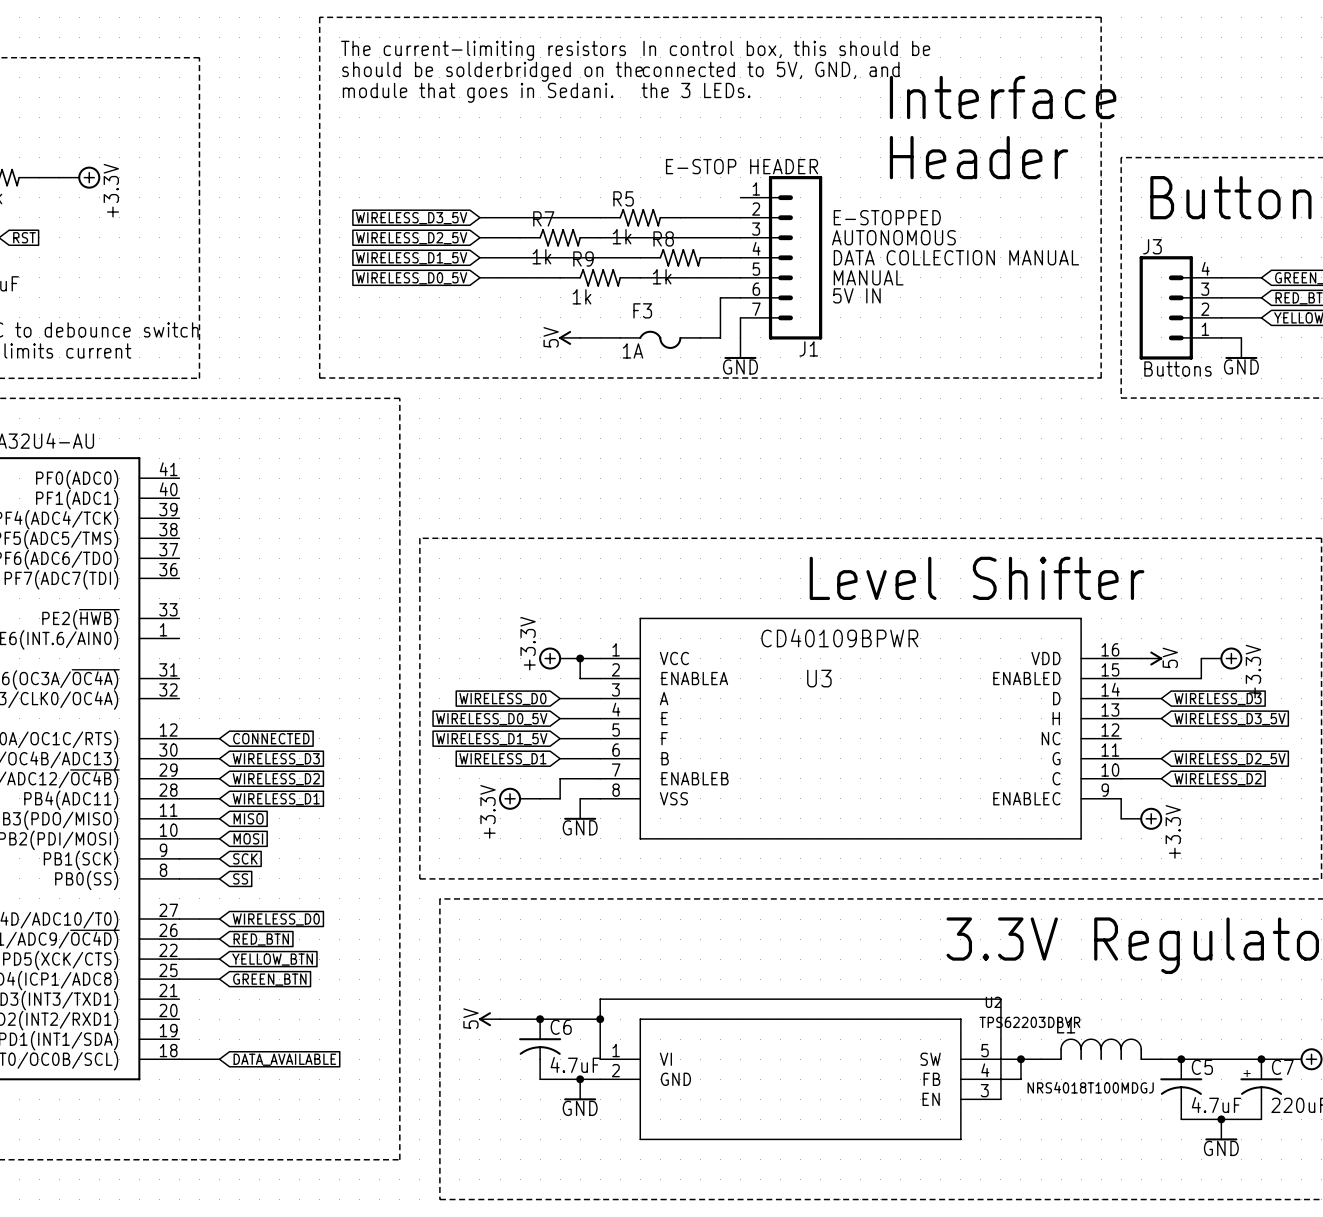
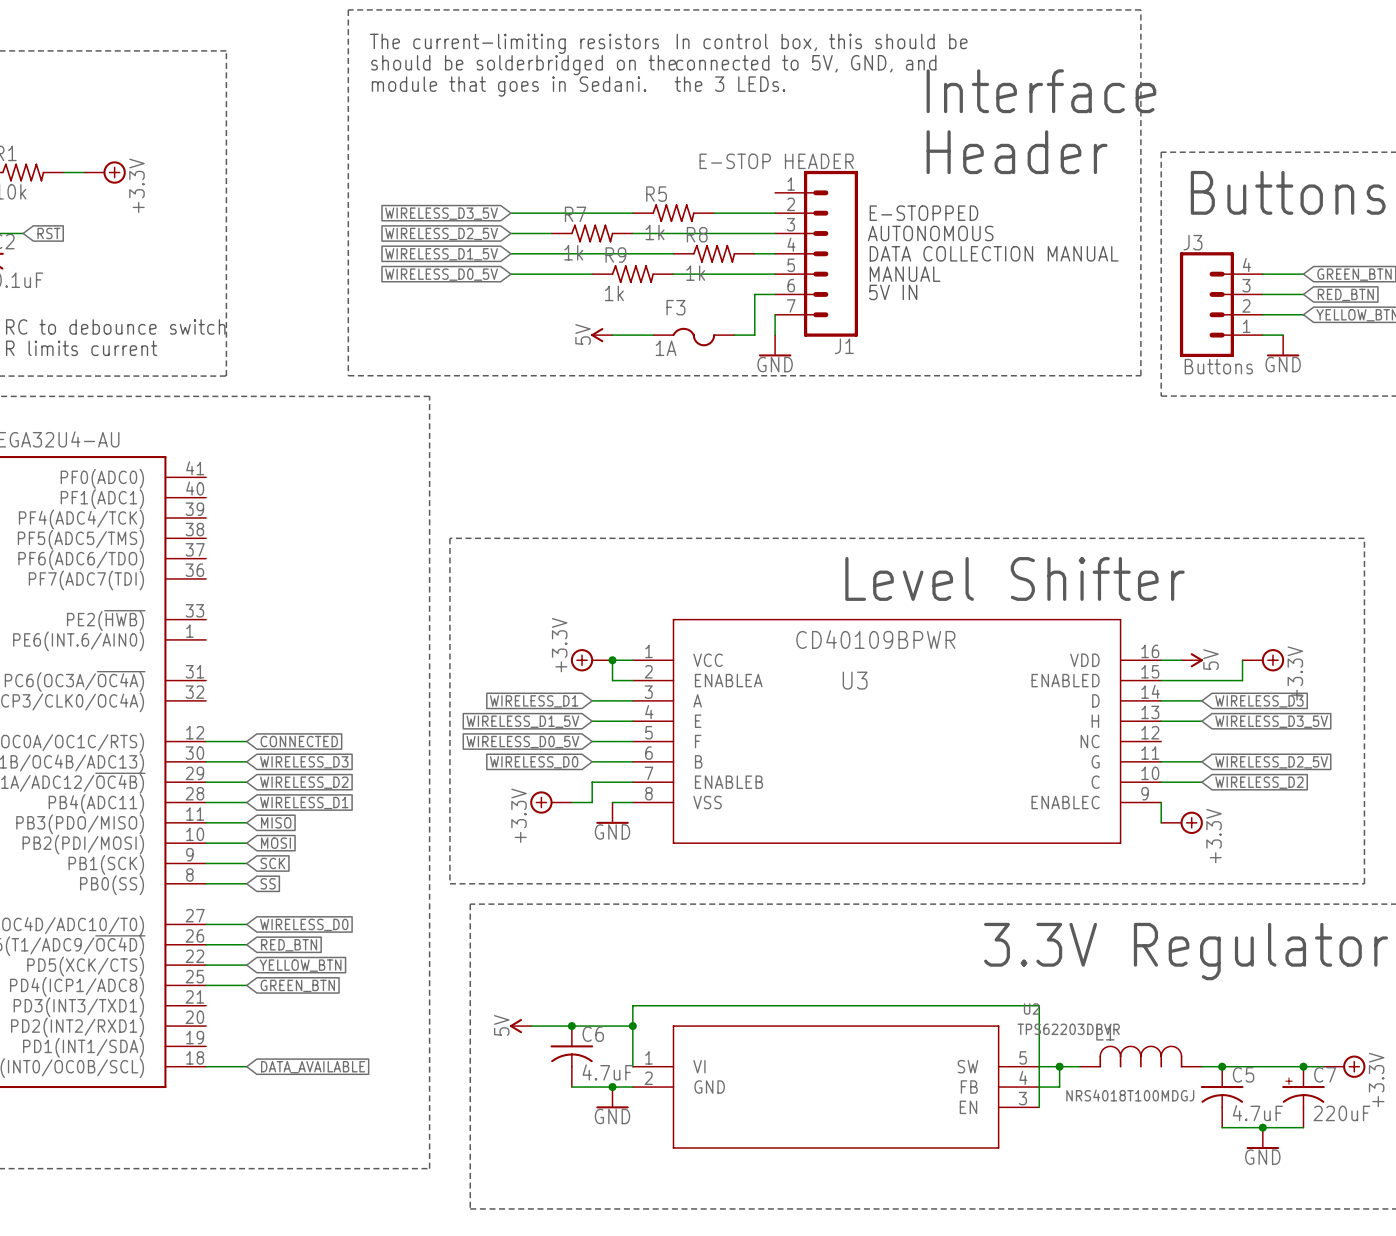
global label: WIRELESS_D0 (502, 699) -> WIRELESS_D1 (534, 701)
global label: WIRELESS_D0_5V (491, 719) -> WIRELESS_D1_5V (522, 721)
global label: WIRELESS_D1_5V (491, 739) -> WIRELESS_D0_5V (522, 742)
global label: WIRELESS_D1 (502, 759) -> WIRELESS_D0 (534, 762)

